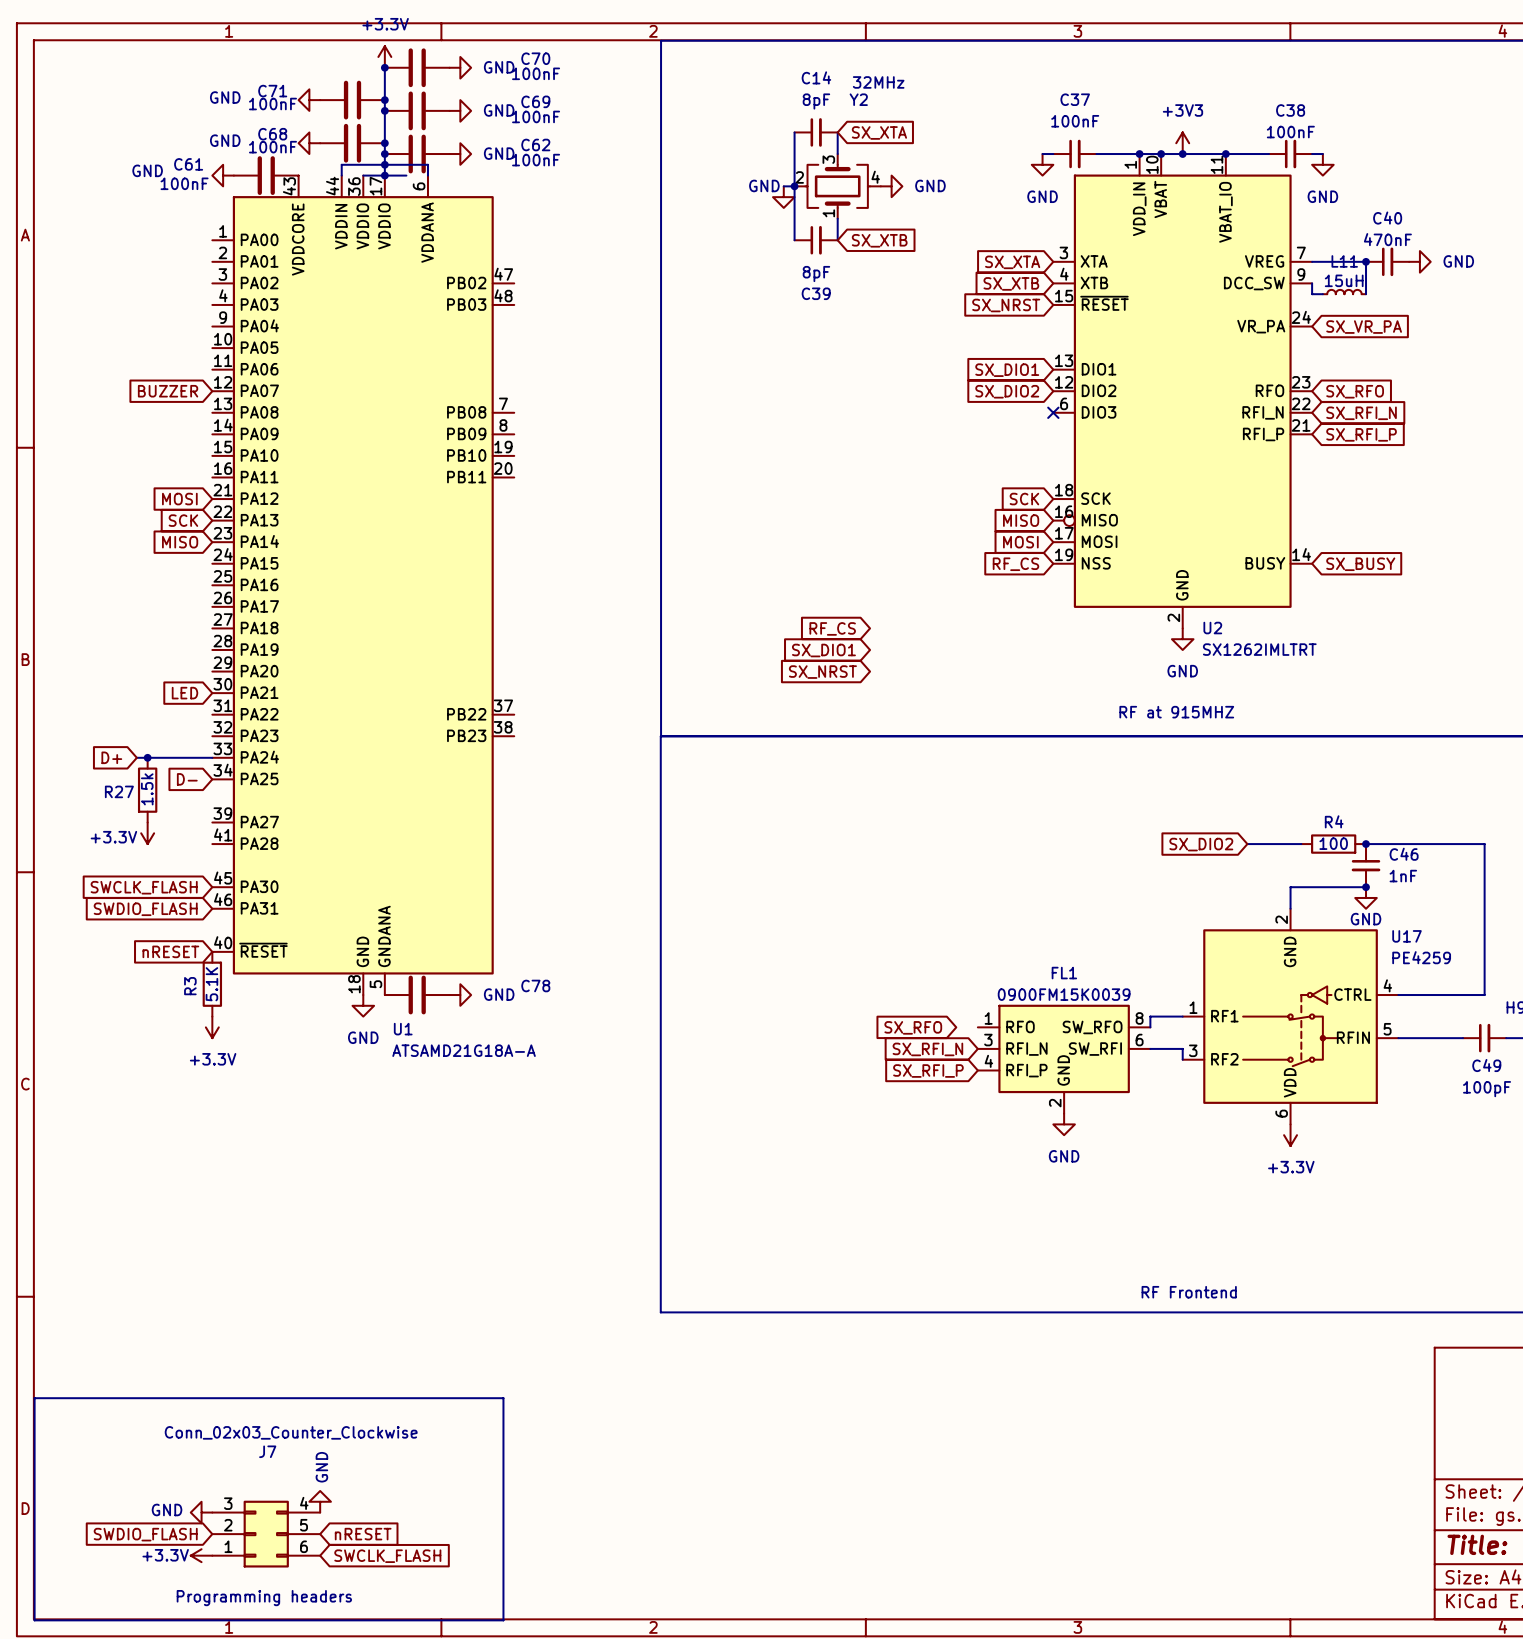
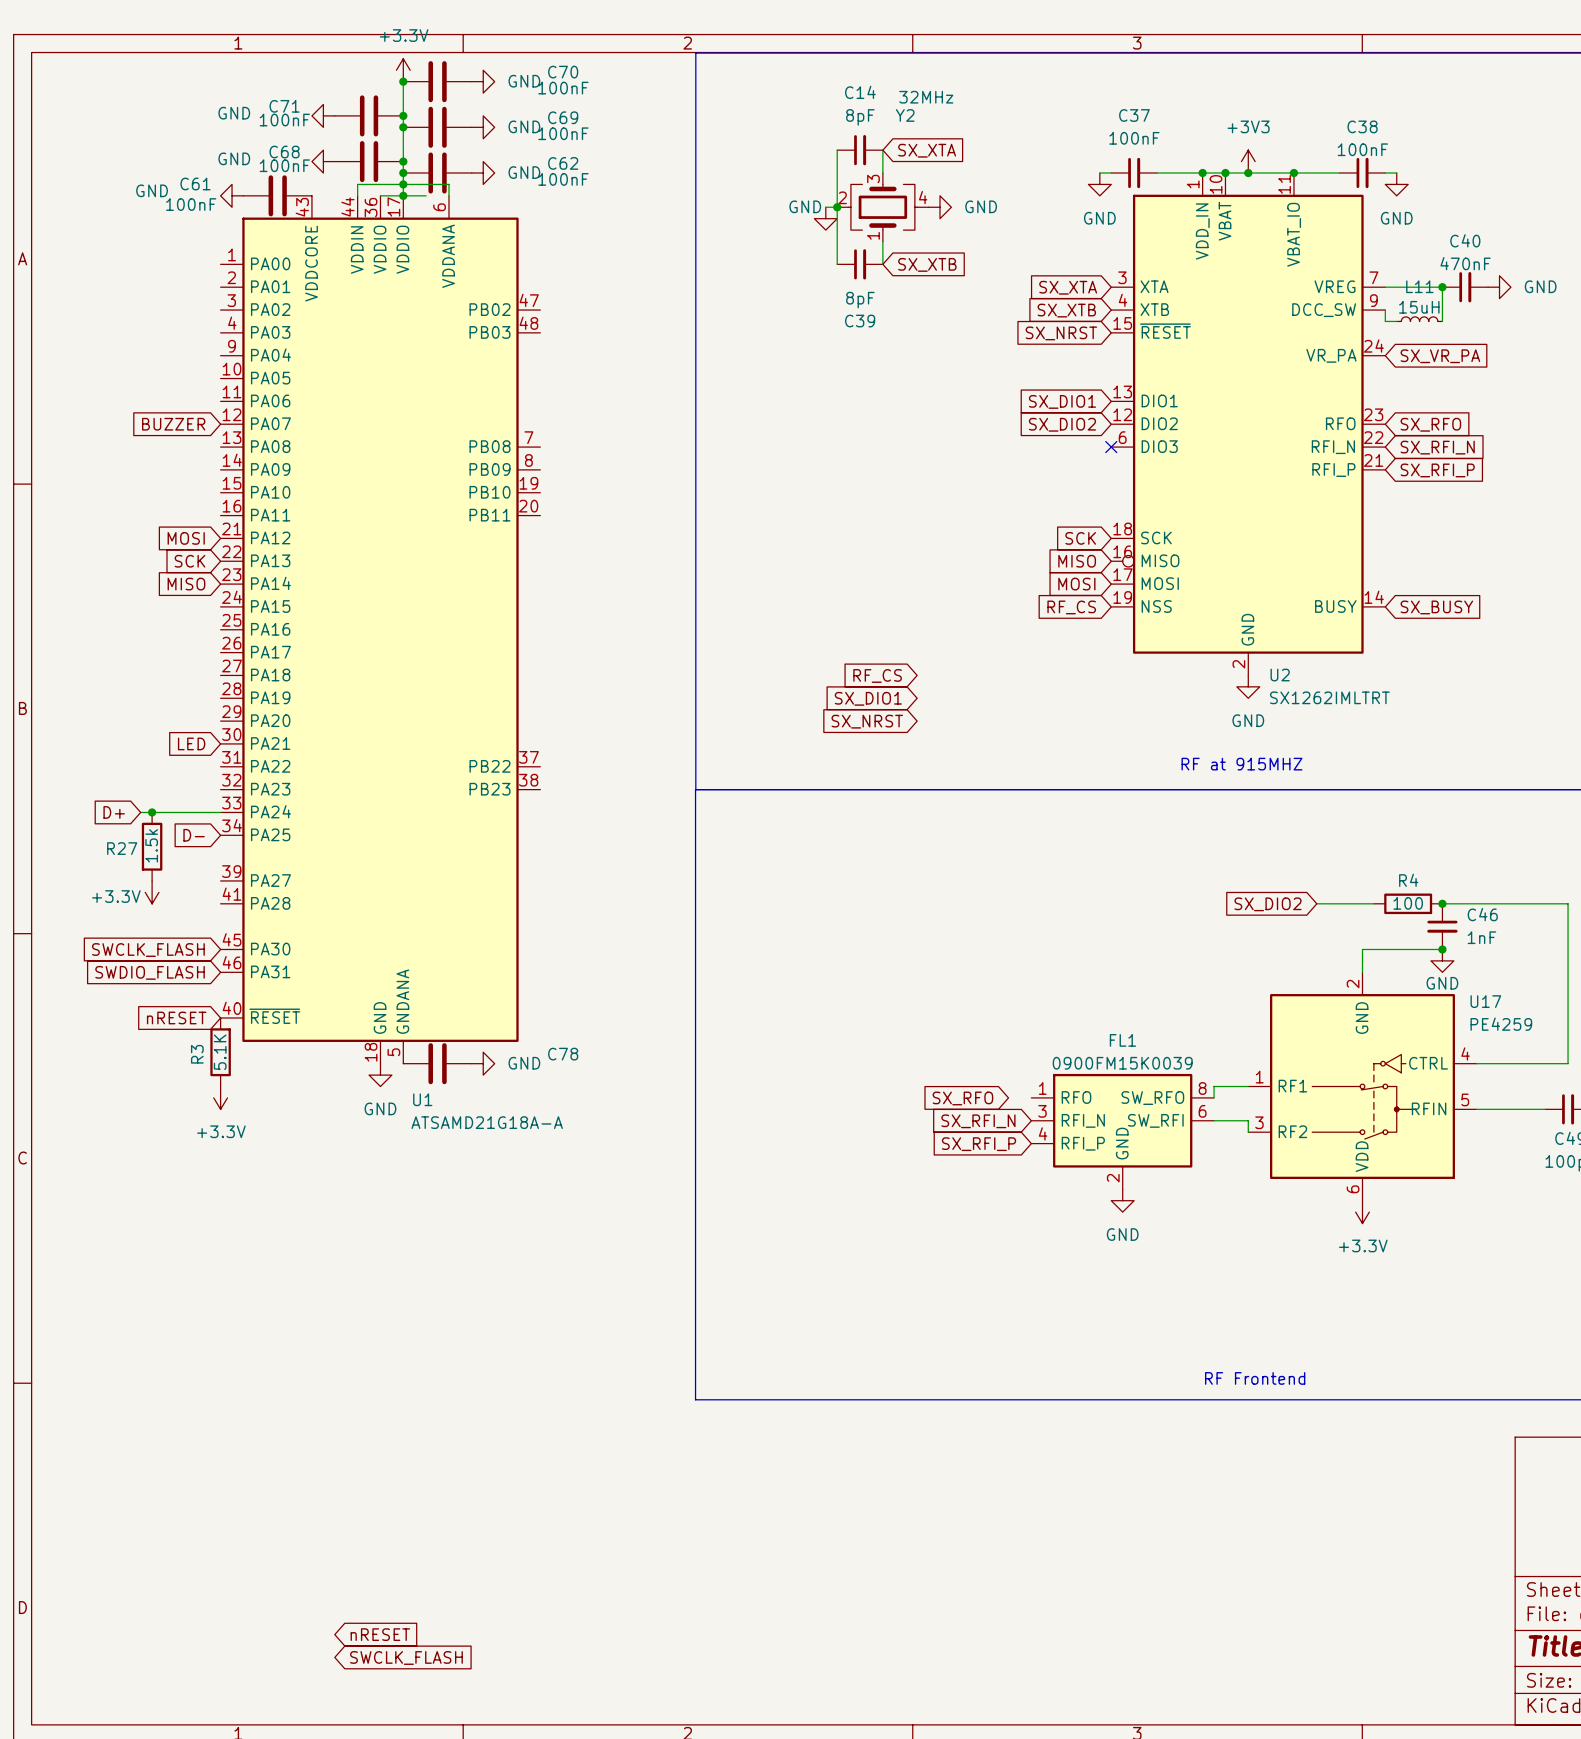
line: (34, 1398) (503, 1398) (503, 1620) (34, 1620) (34, 1398) -> none
power symbol: GND (320, 1501) -> none
power symbol: GND (201, 1512) -> none
global label: SWDIO_FLASH (145, 1534) -> none
J7: Conn_02x03_Counter_Clockwise (266, 1534) -> none
power symbol: +3.3V (201, 1555) -> none
text: Programming headers (264, 1598) -> none

